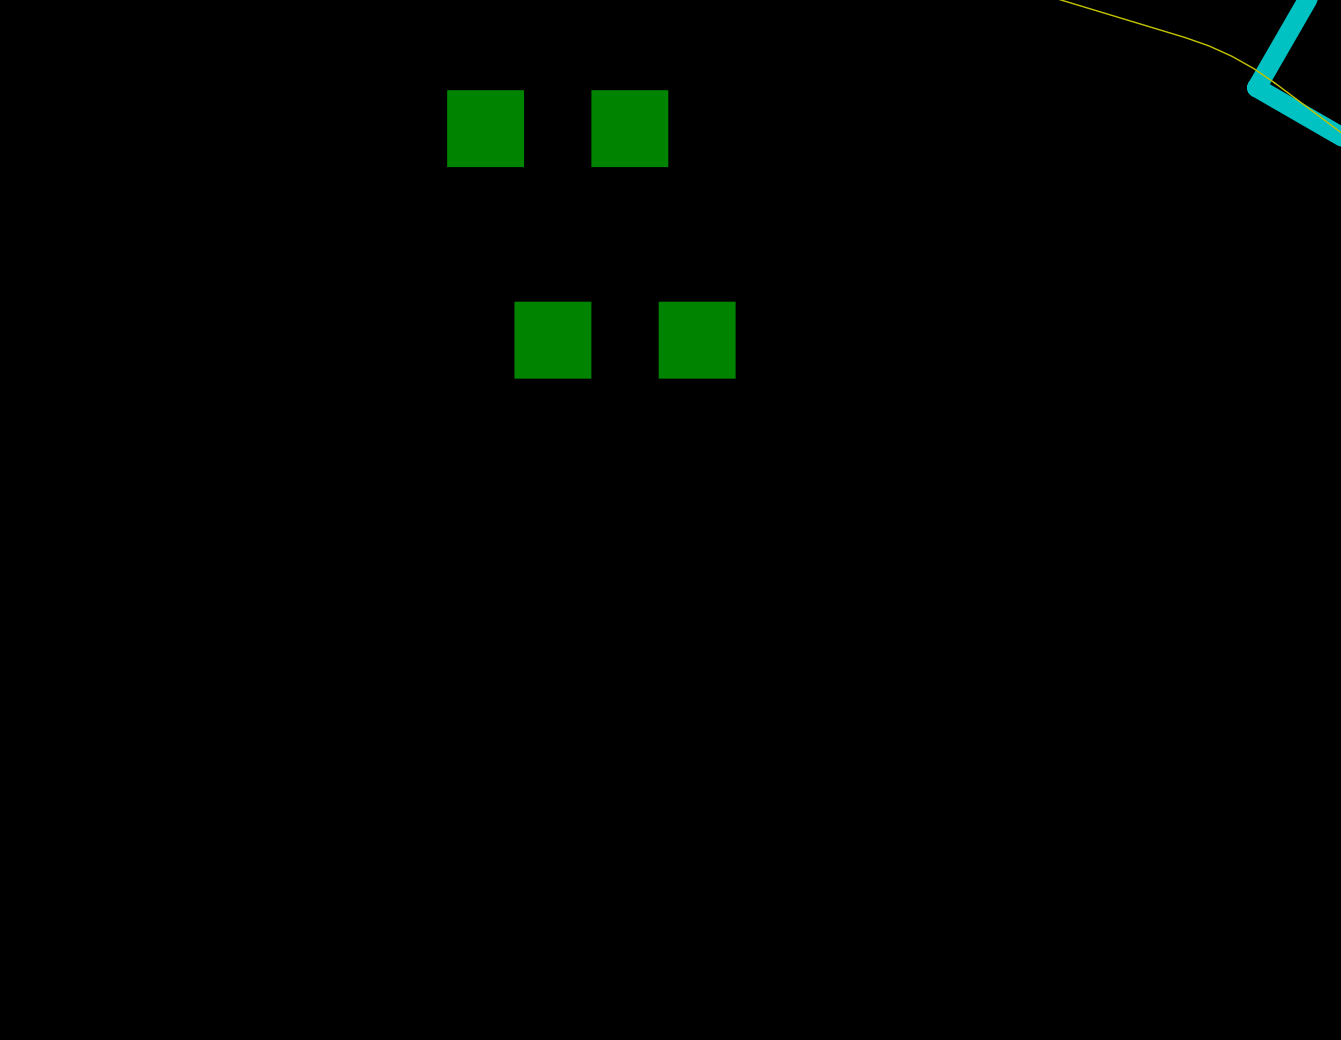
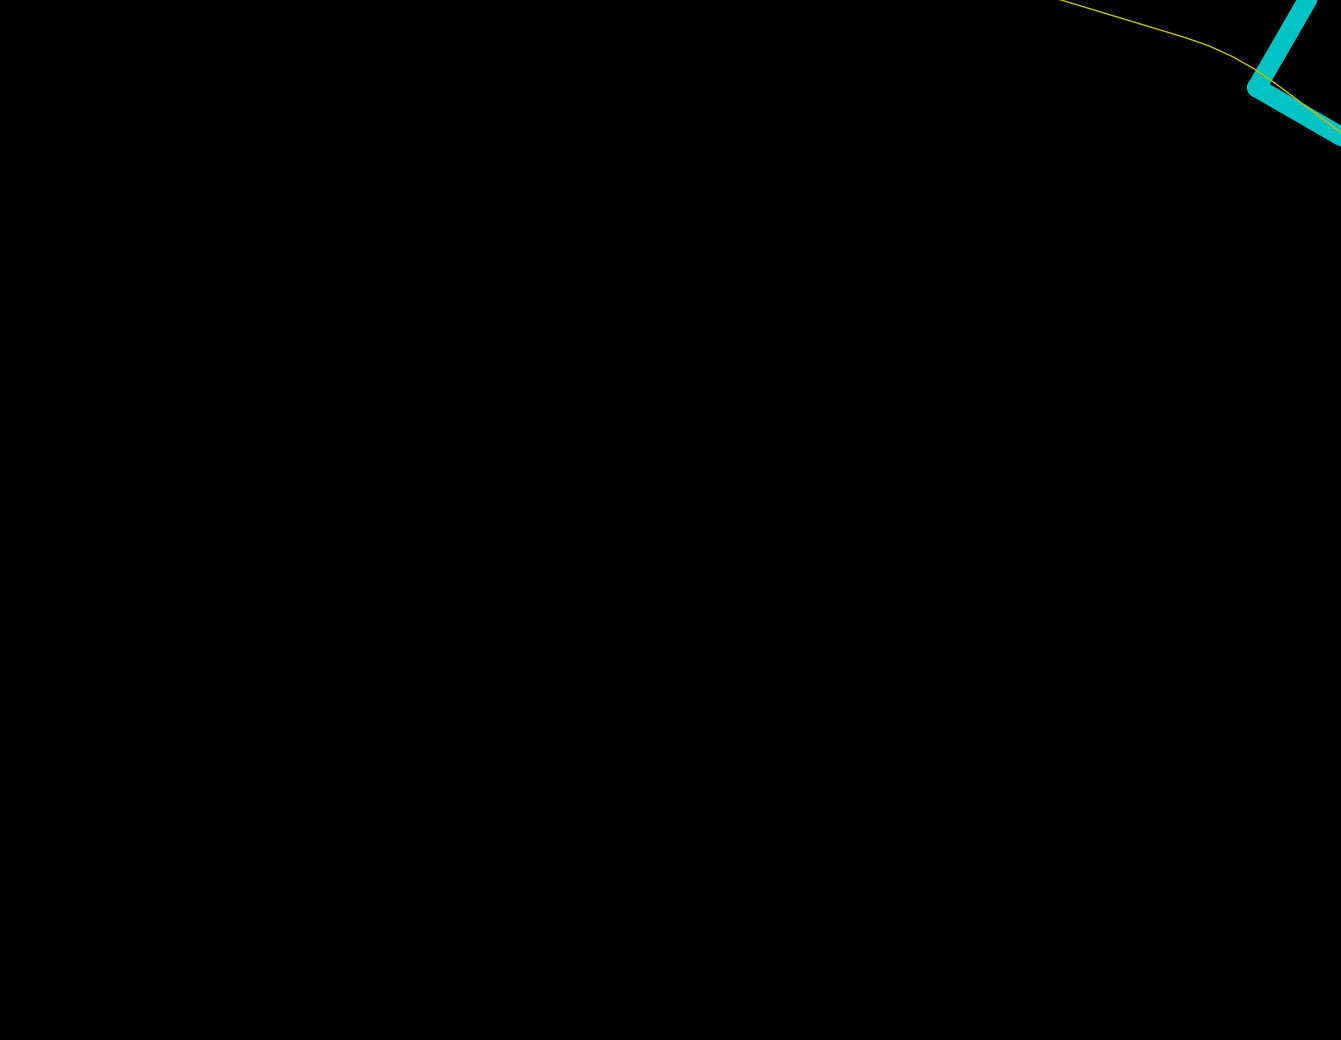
part: (557, 128) -> none
part: (625, 340) -> none

